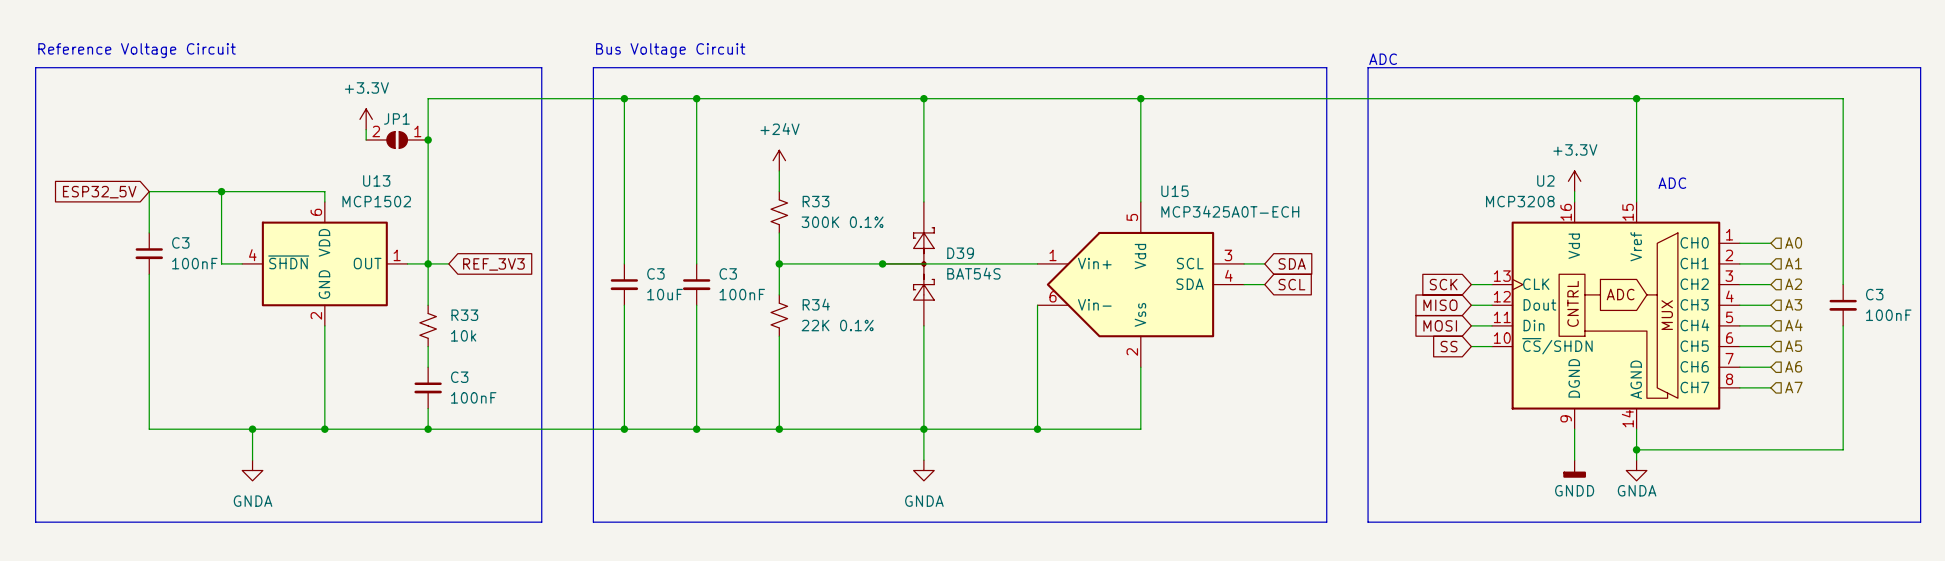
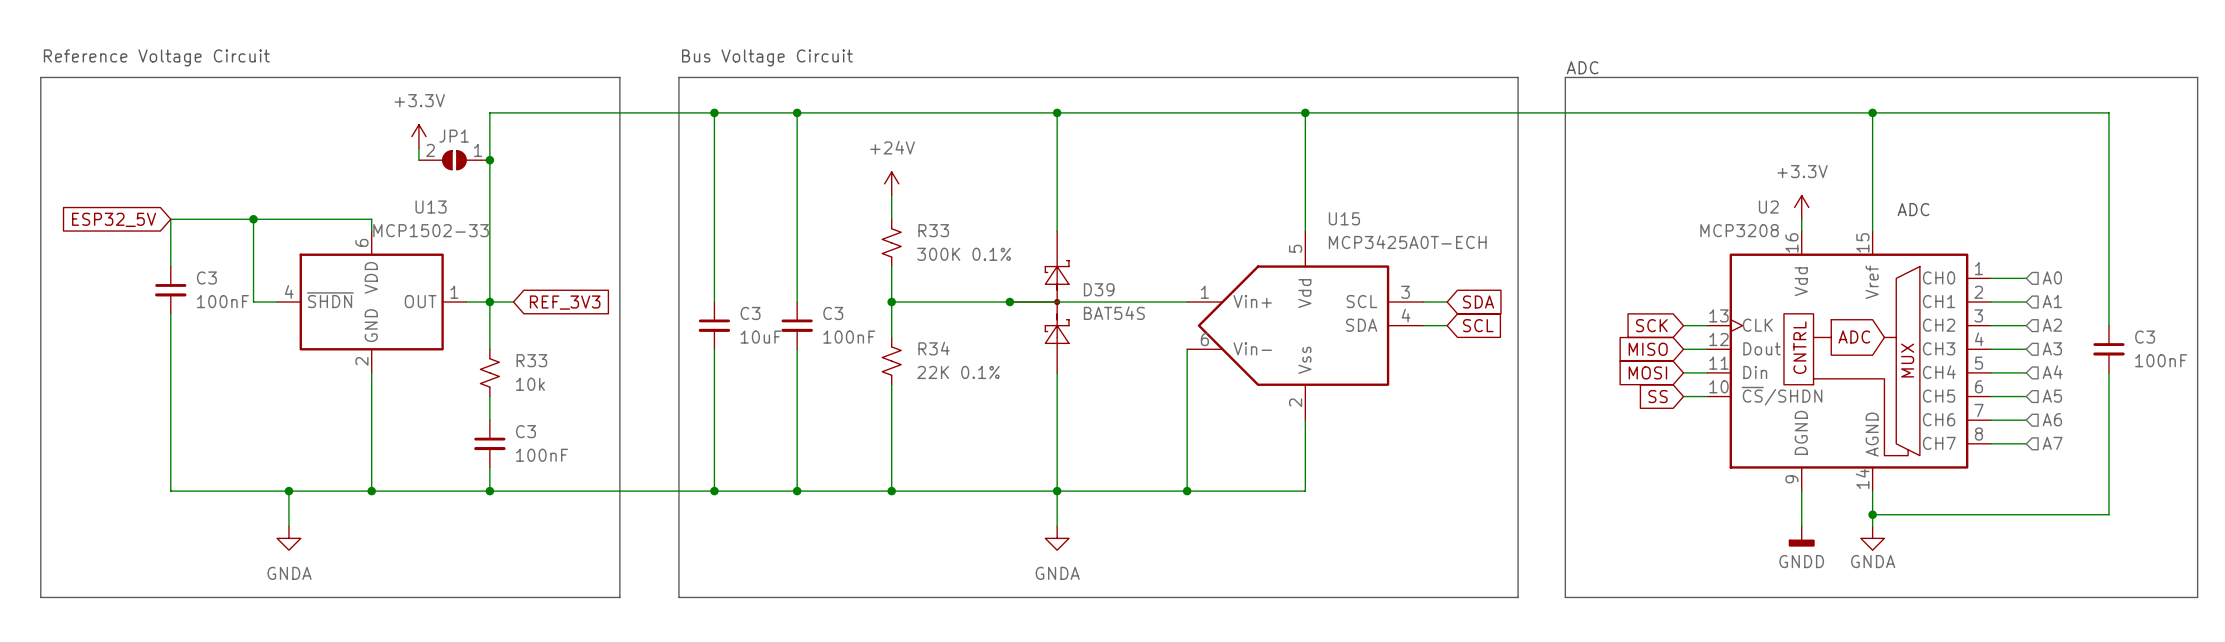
U13 value: MCP1502 (376, 201) -> MCP1502-33 (431, 230)

